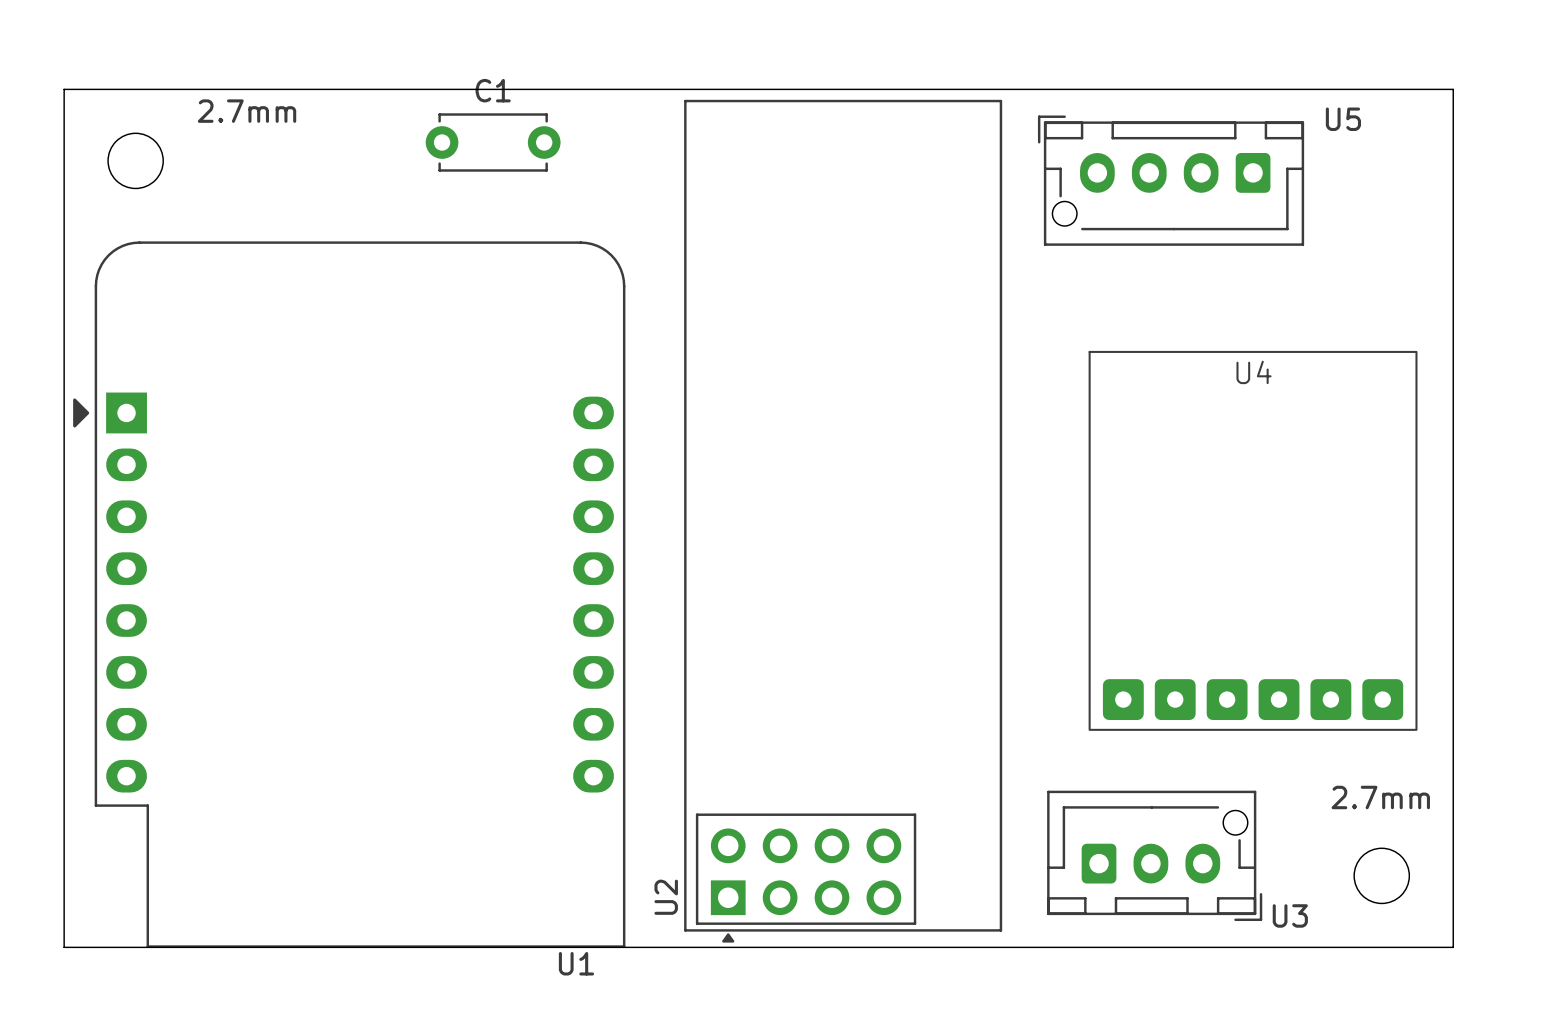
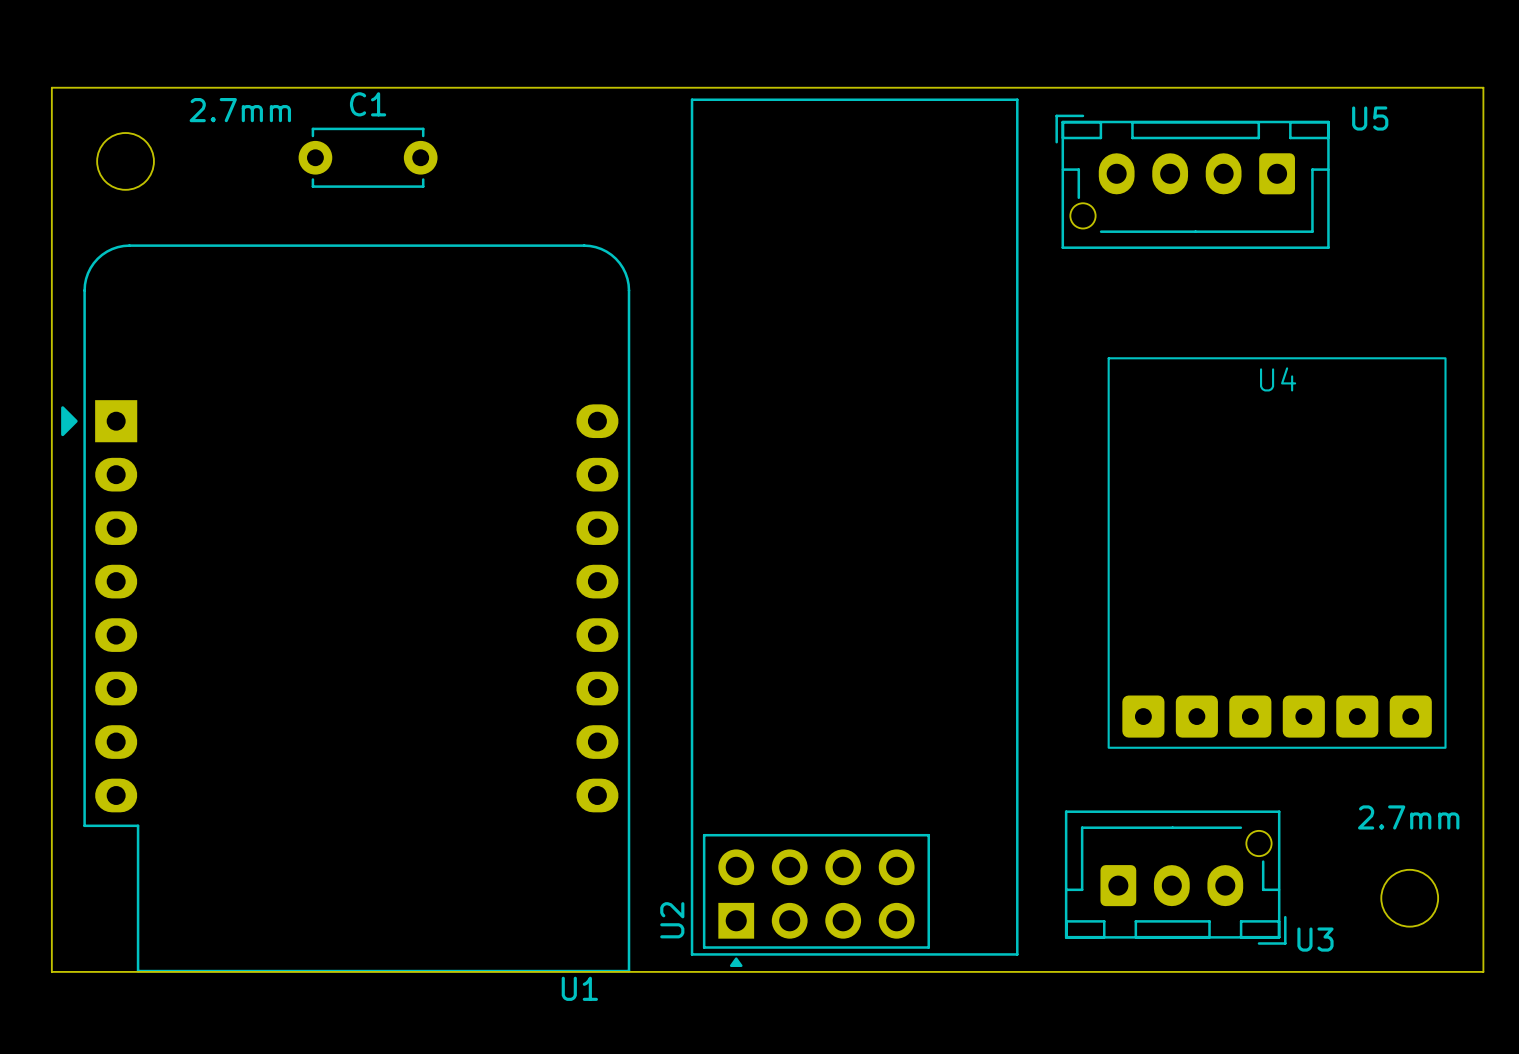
C1 position: (493, 142) -> (368, 157)

